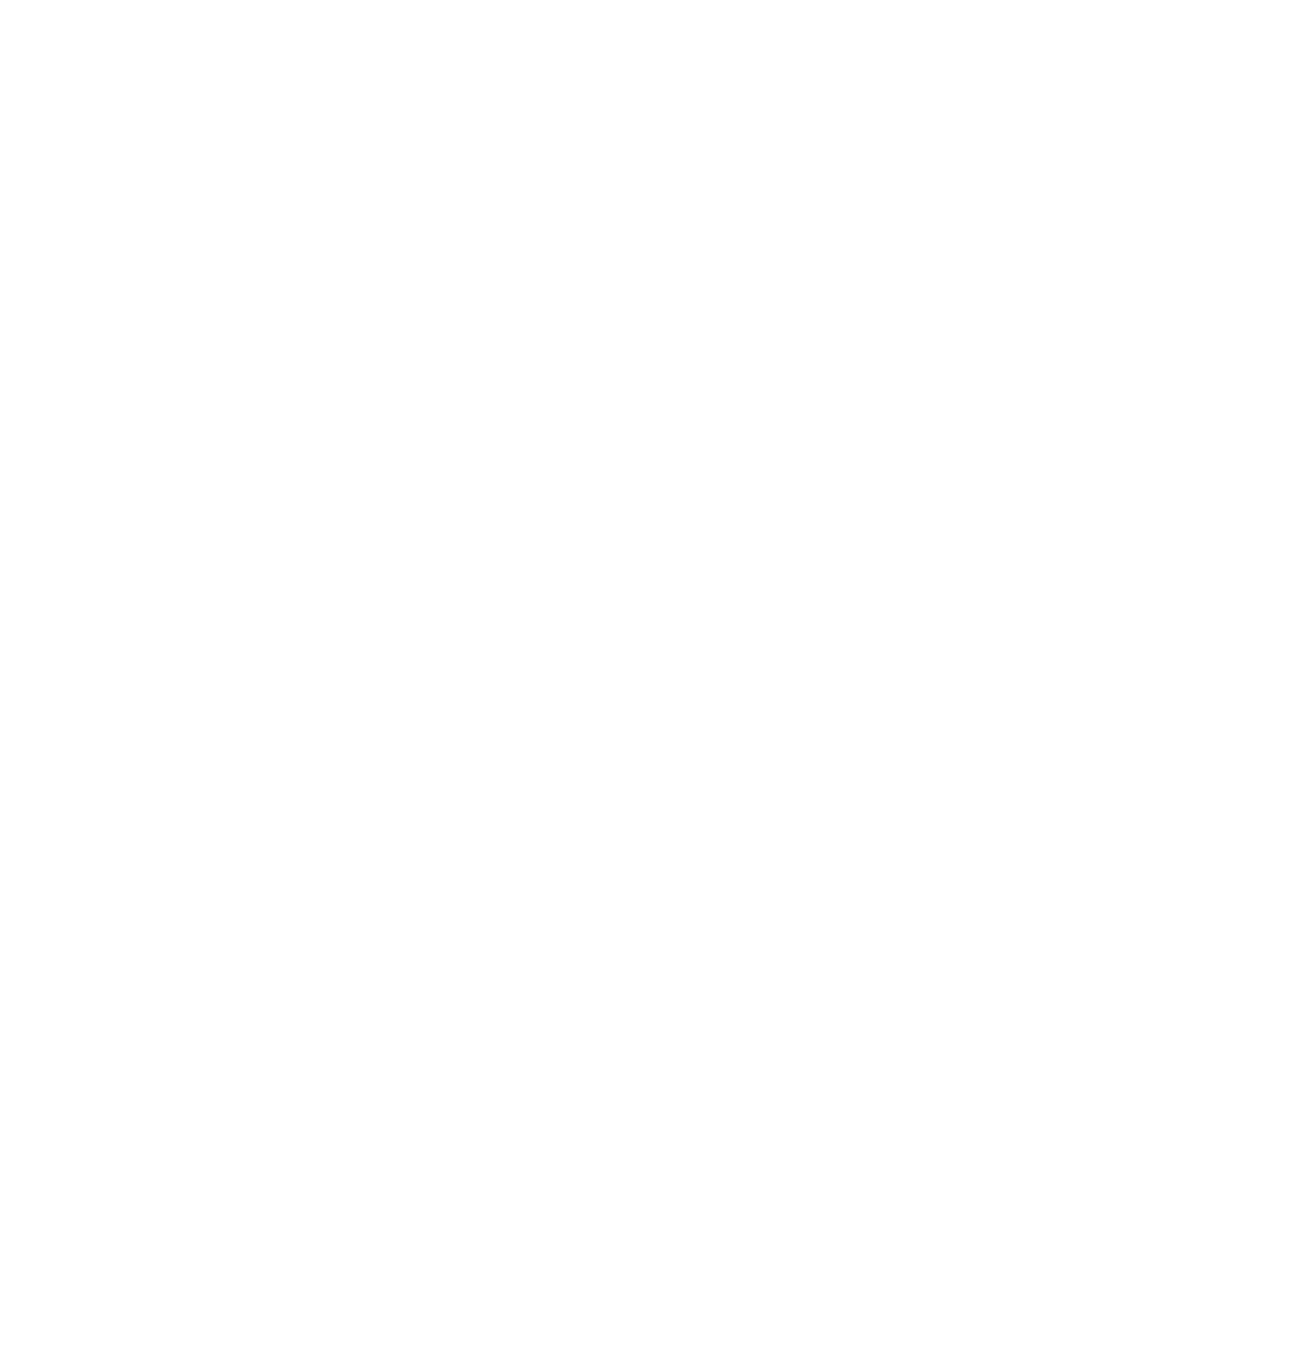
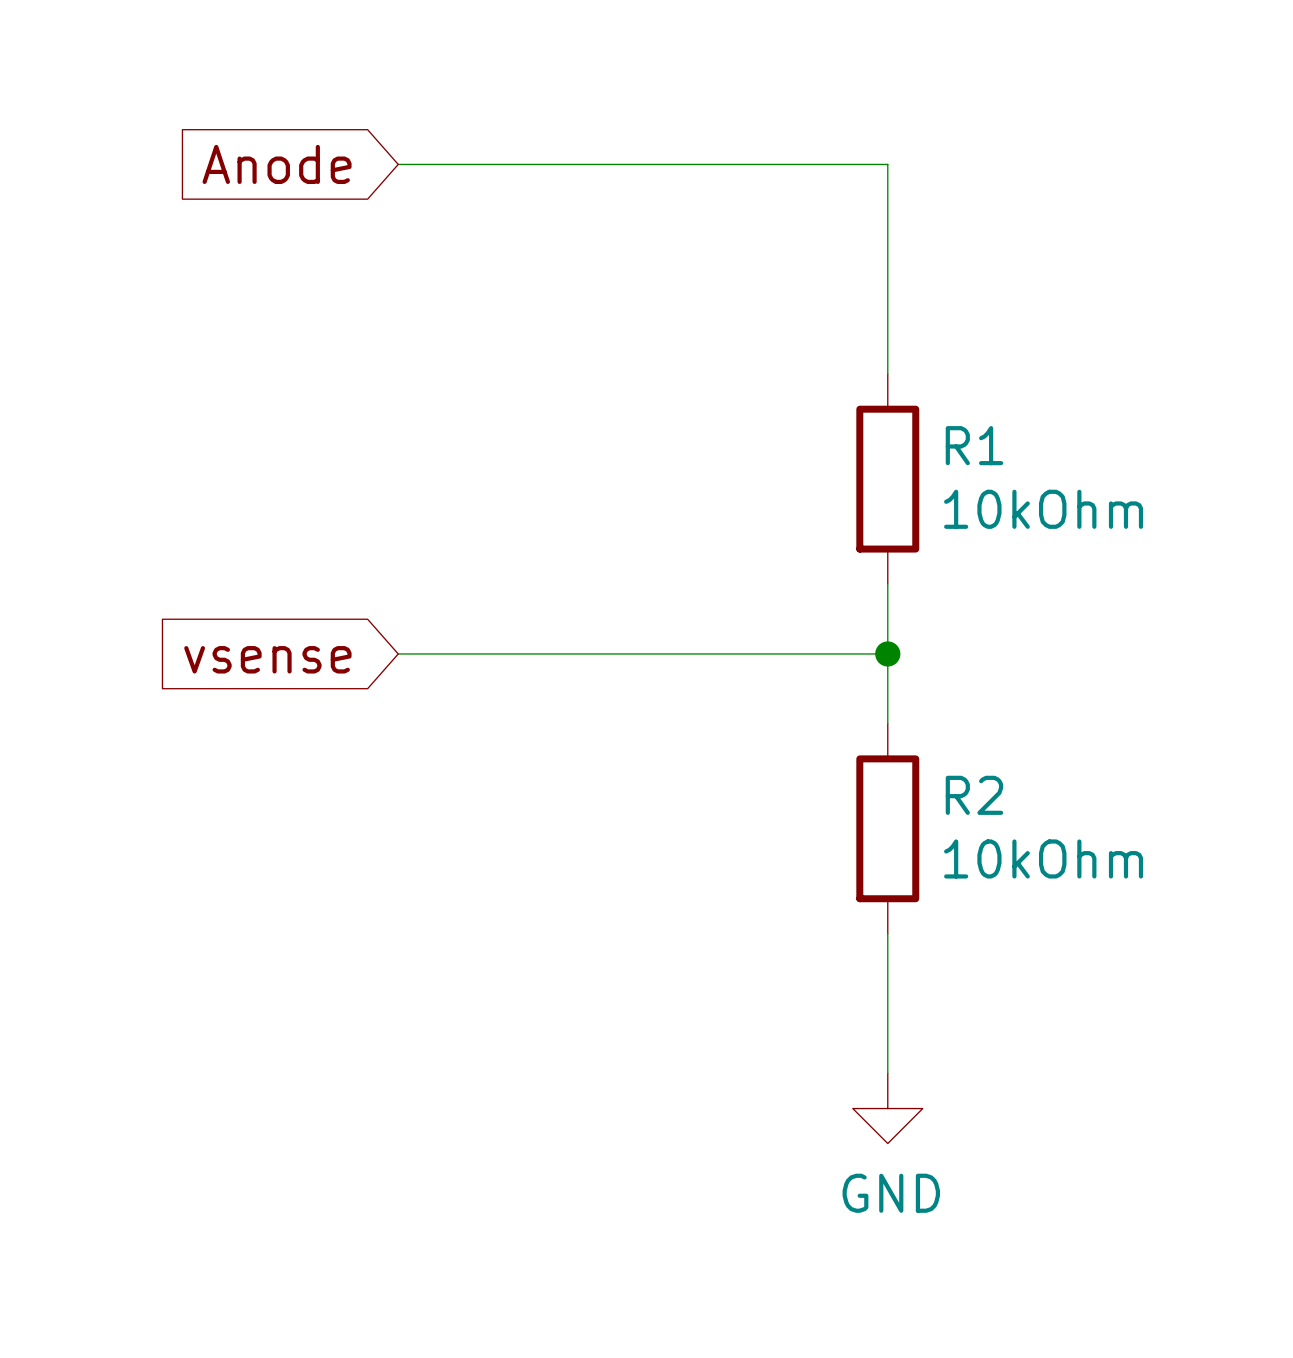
global label: none -> Anode (277, 164)
wire: none -> (398, 164) (887, 164) (887, 374)
R1: none -> 10kOhm (887, 479)
wire: none -> (887, 584) (887, 723)
wire: none -> (398, 653) (887, 653)
junction: none -> (887, 653)
global label: none -> vsense (267, 659)
R2: none -> 10kOhm (887, 828)
wire: none -> (887, 933) (887, 1073)
power symbol: none -> GND (887, 1108)

